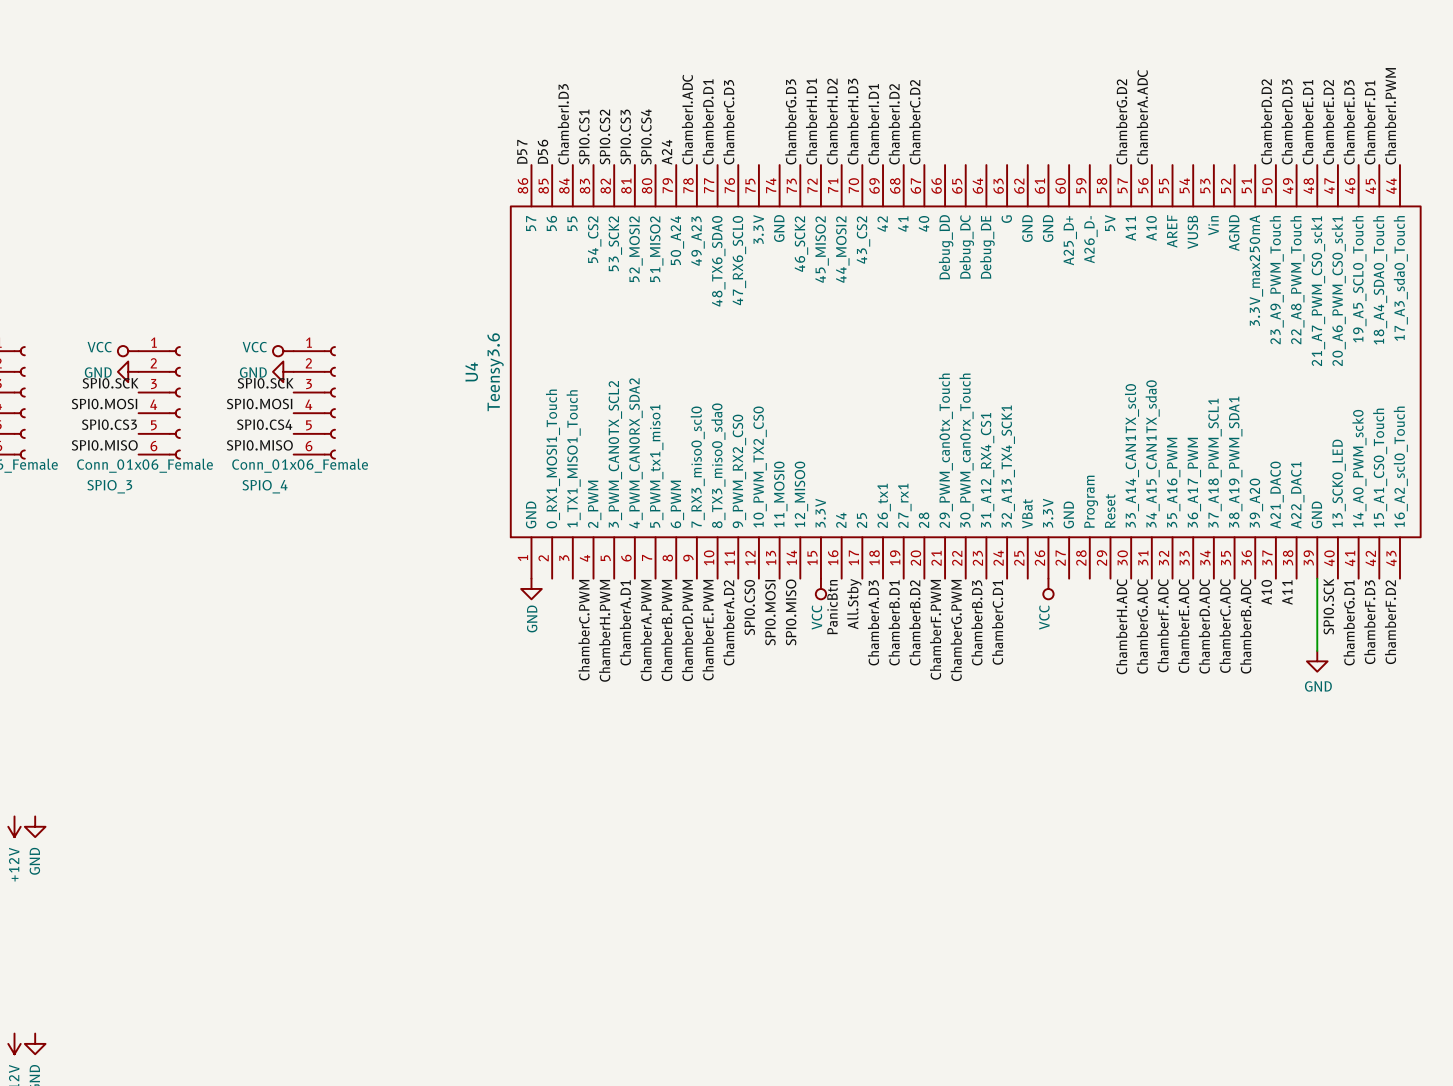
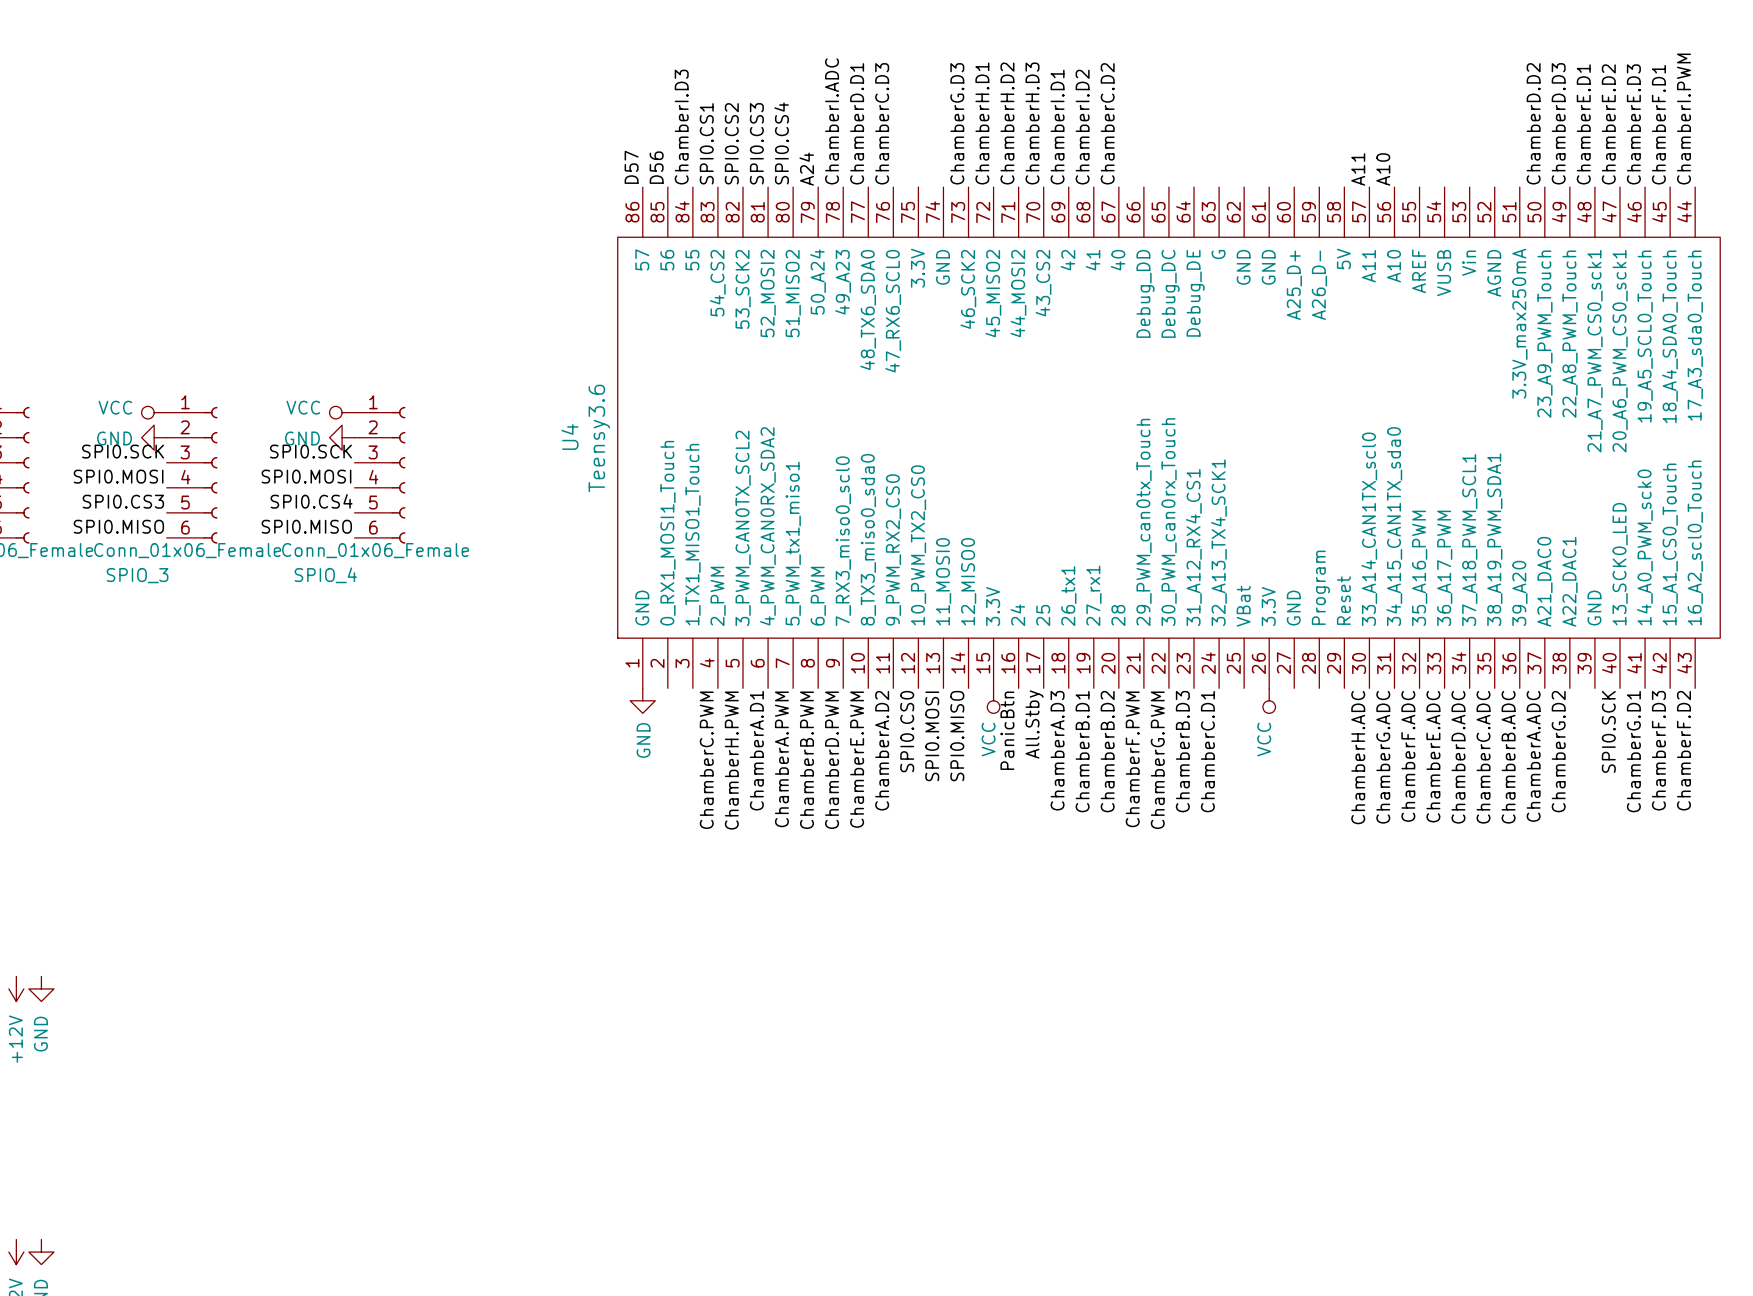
label: ChamberA.ADC (1142, 117) -> A10 (1383, 169)
label: ChamberG.D2 (1121, 121) -> A11 (1358, 169)
wire: (1317, 578) (1317, 651) -> none
label: A10 (1266, 592) -> ChamberA.ADC (1533, 756)
label: A11 (1287, 592) -> ChamberG.D2 (1558, 751)
power symbol: GND (1317, 661) -> none

